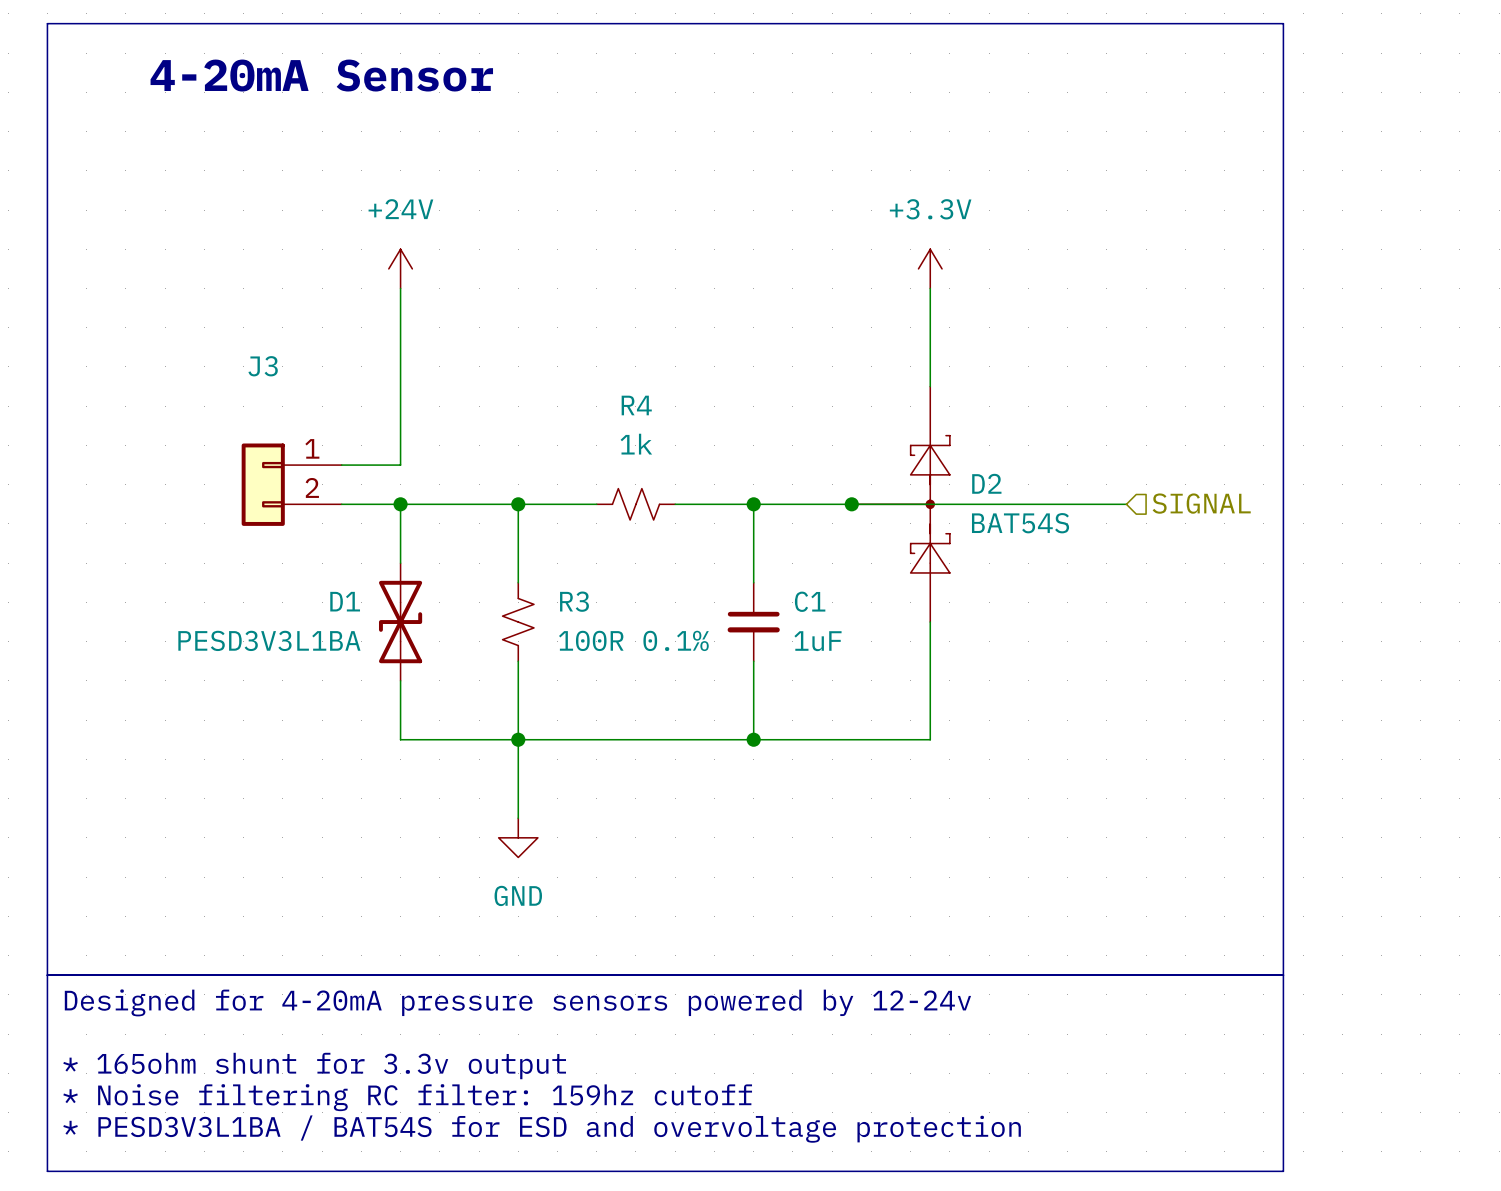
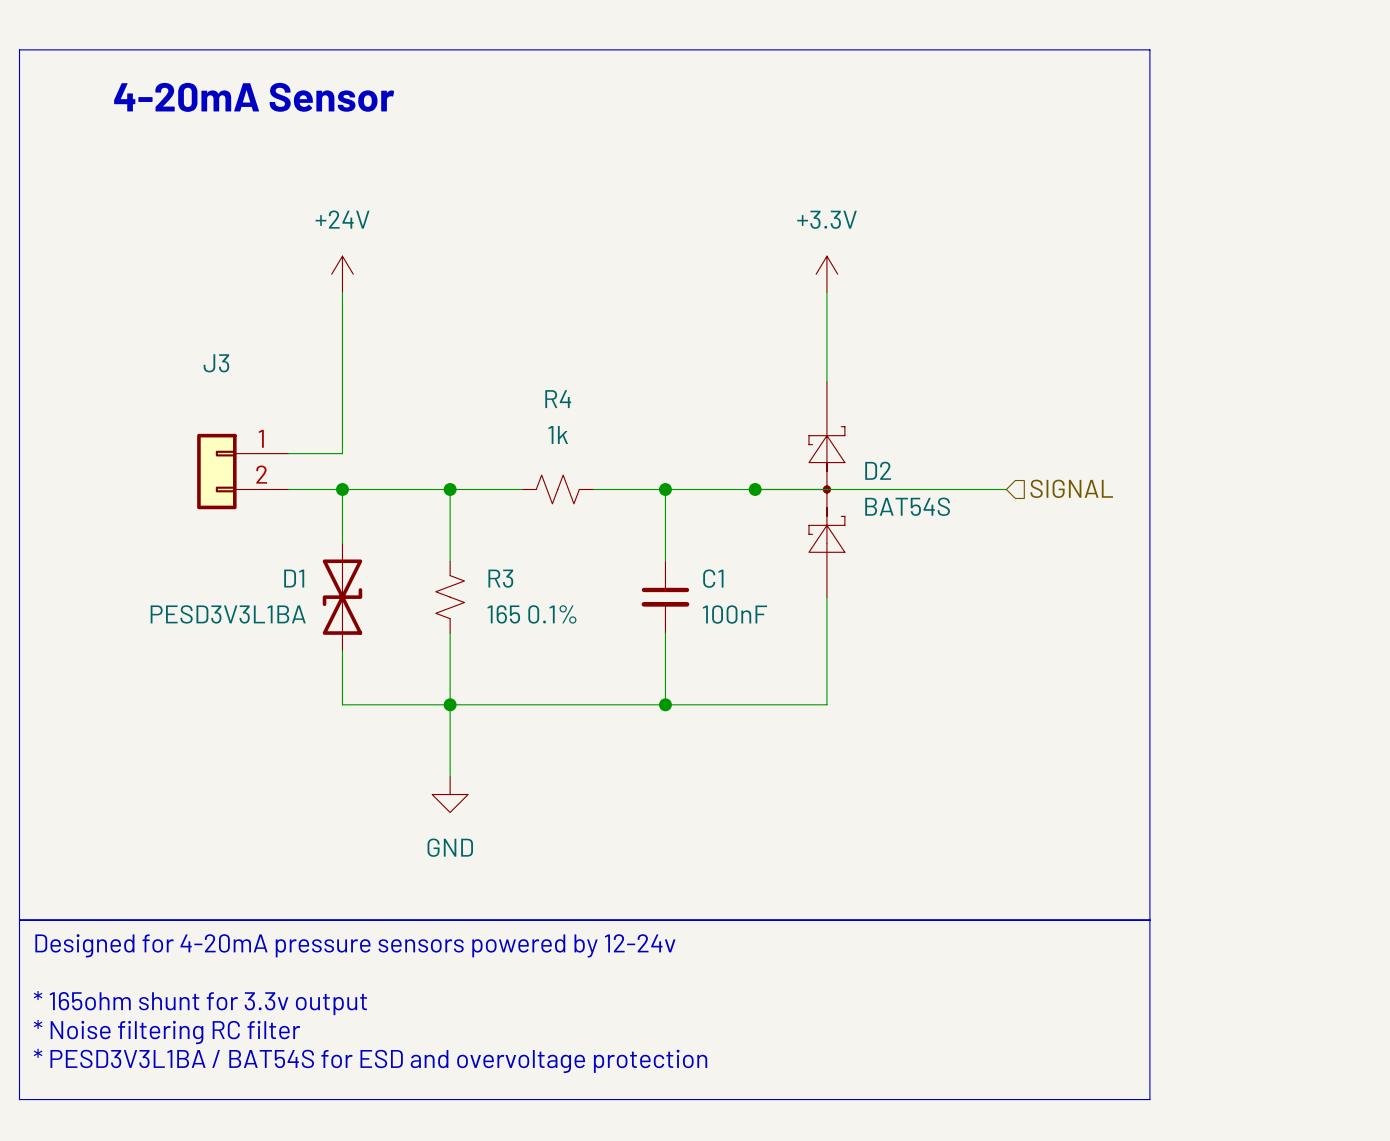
R3 value: 100R 0.1% (633, 640) -> 165 0.1% (531, 614)
C1 value: 1uF (817, 641) -> 100nF (734, 614)
text: * Noise filtering RC filter: 159hz cutoff (407, 1097) -> * Noise filtering RC filter (166, 1032)

